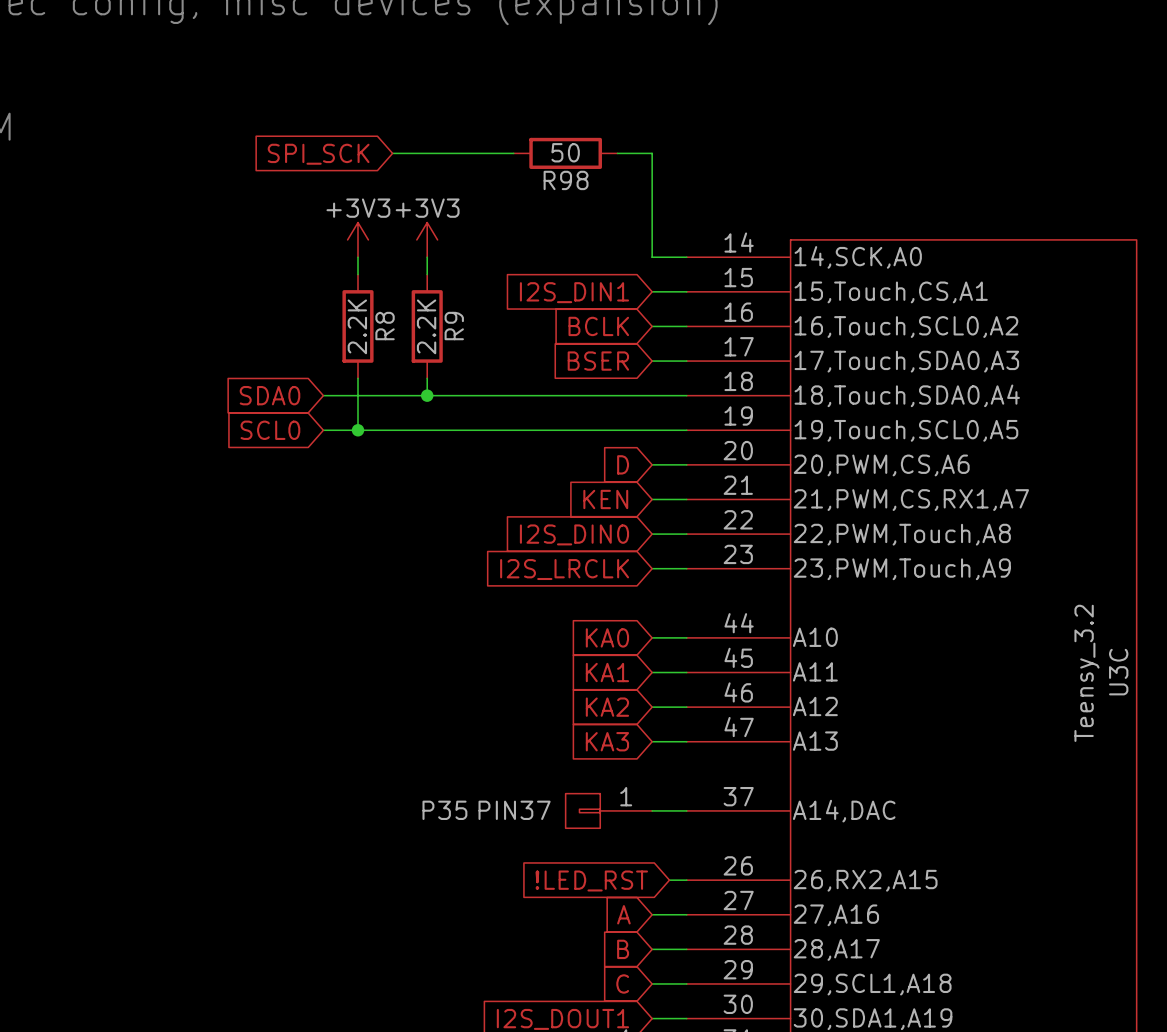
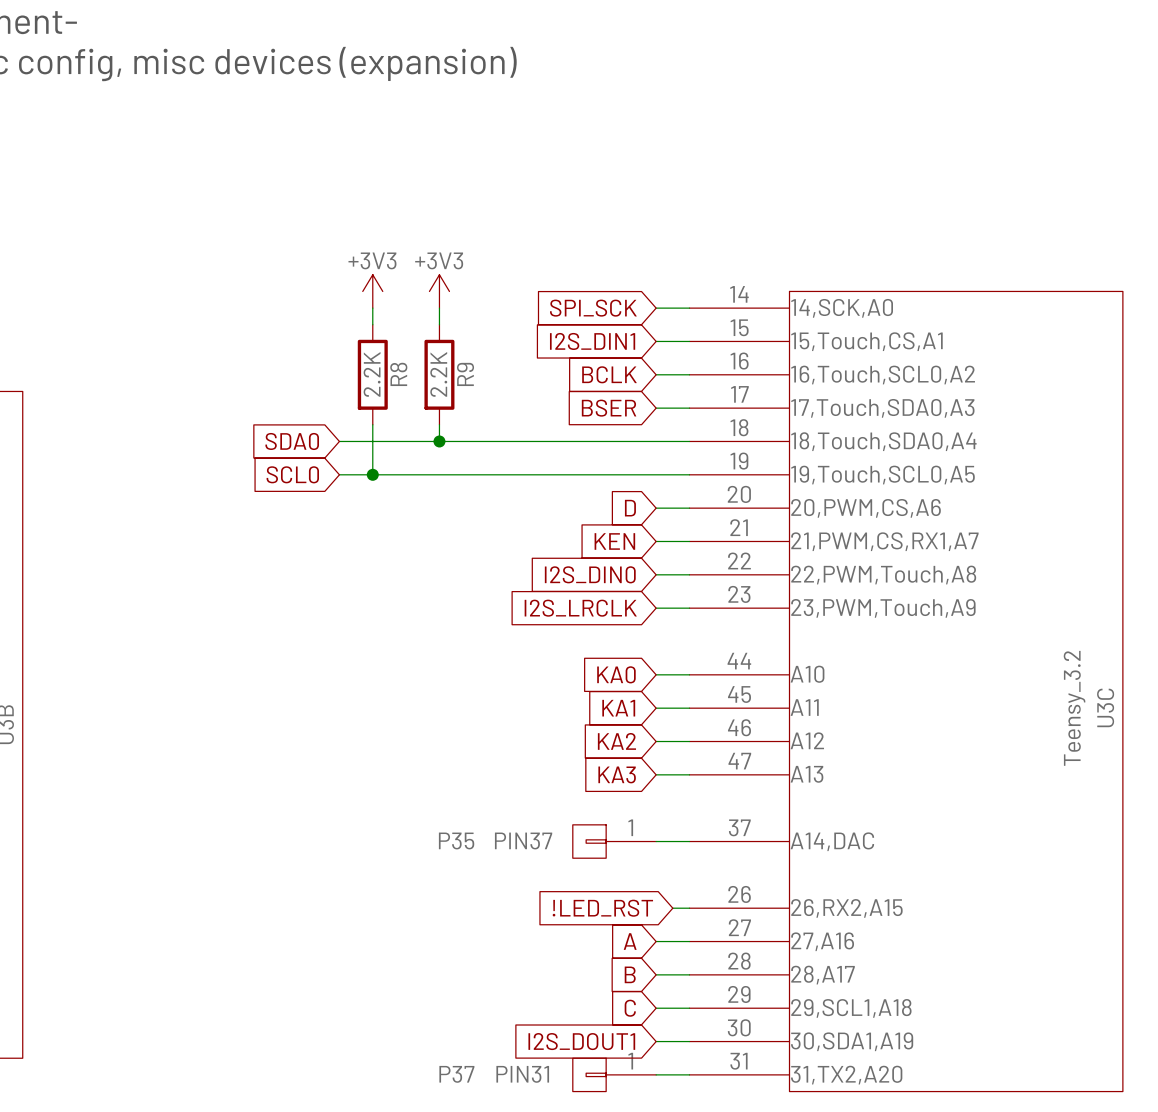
wire: (392, 153) (513, 153) -> none
R98: 50 (565, 153) -> none
wire: (617, 153) (652, 153) (652, 257) -> none
global label position: SPI_SCK (318, 154) -> SPI_SCK (593, 308)

